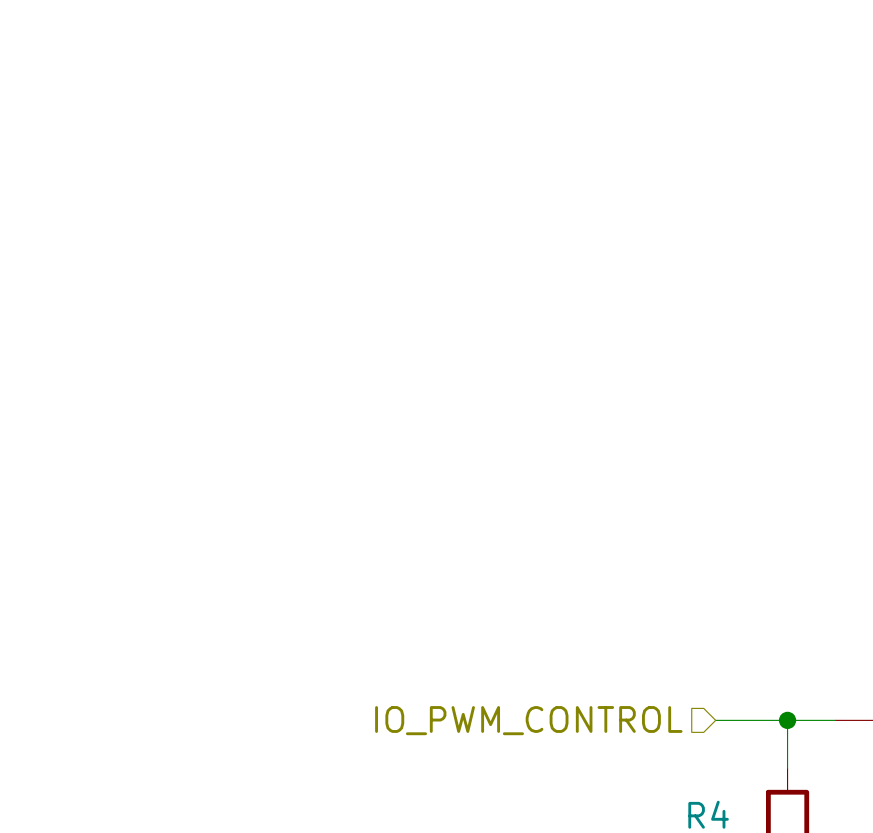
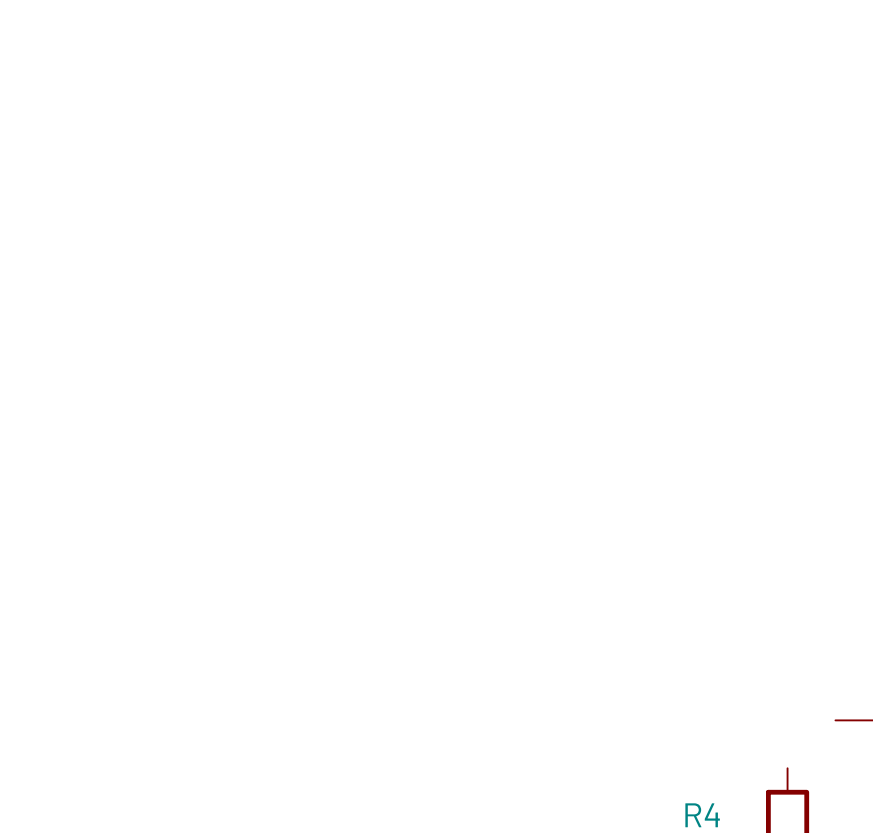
hierarchical label: IO_PWM_CONTROL (528, 720) -> none
wire: (715, 720) (835, 720) -> none
wire: (787, 720) (787, 768) -> none
junction: (787, 720) -> none

